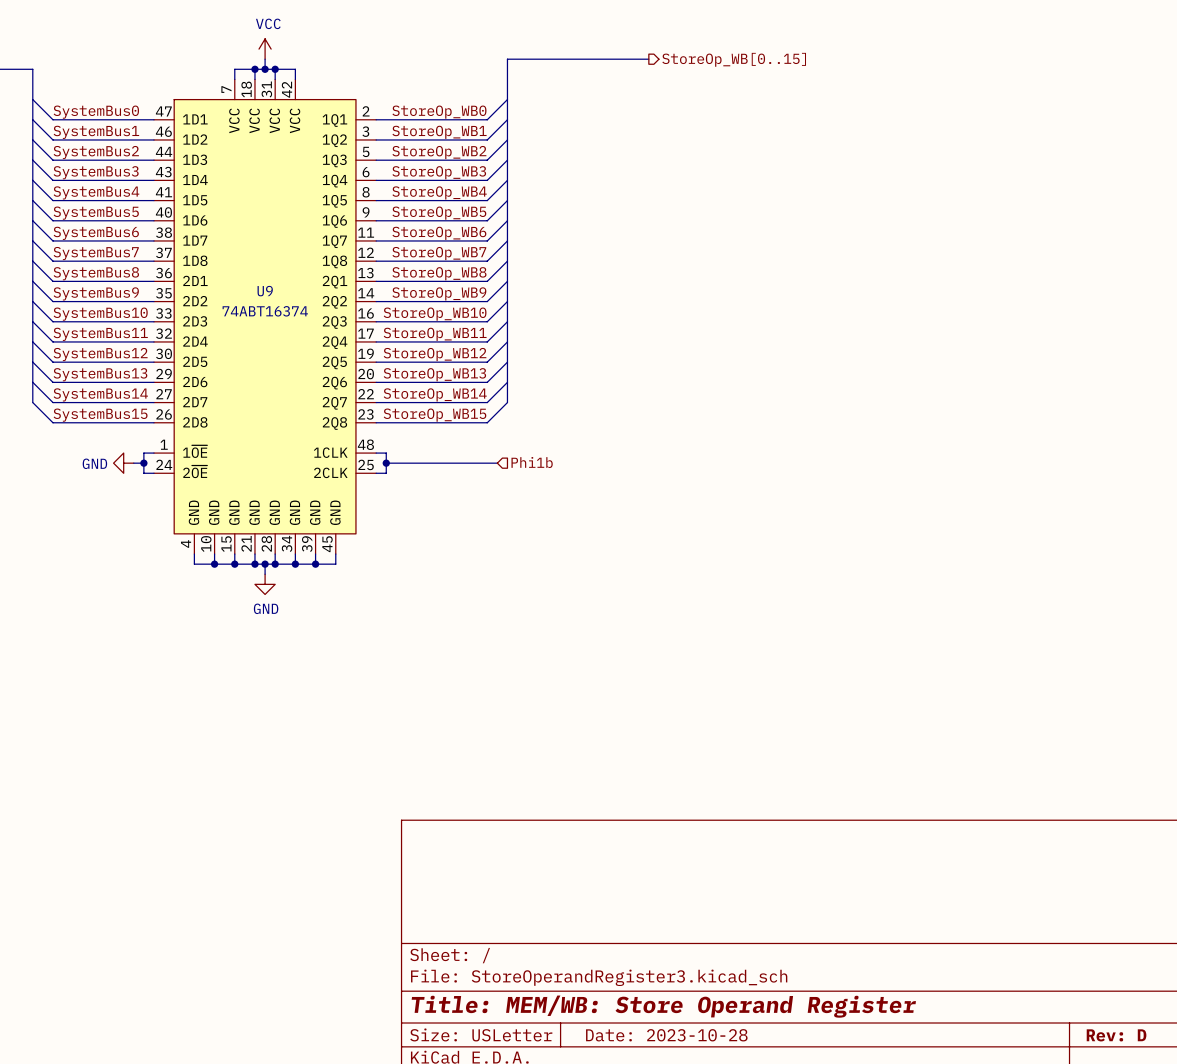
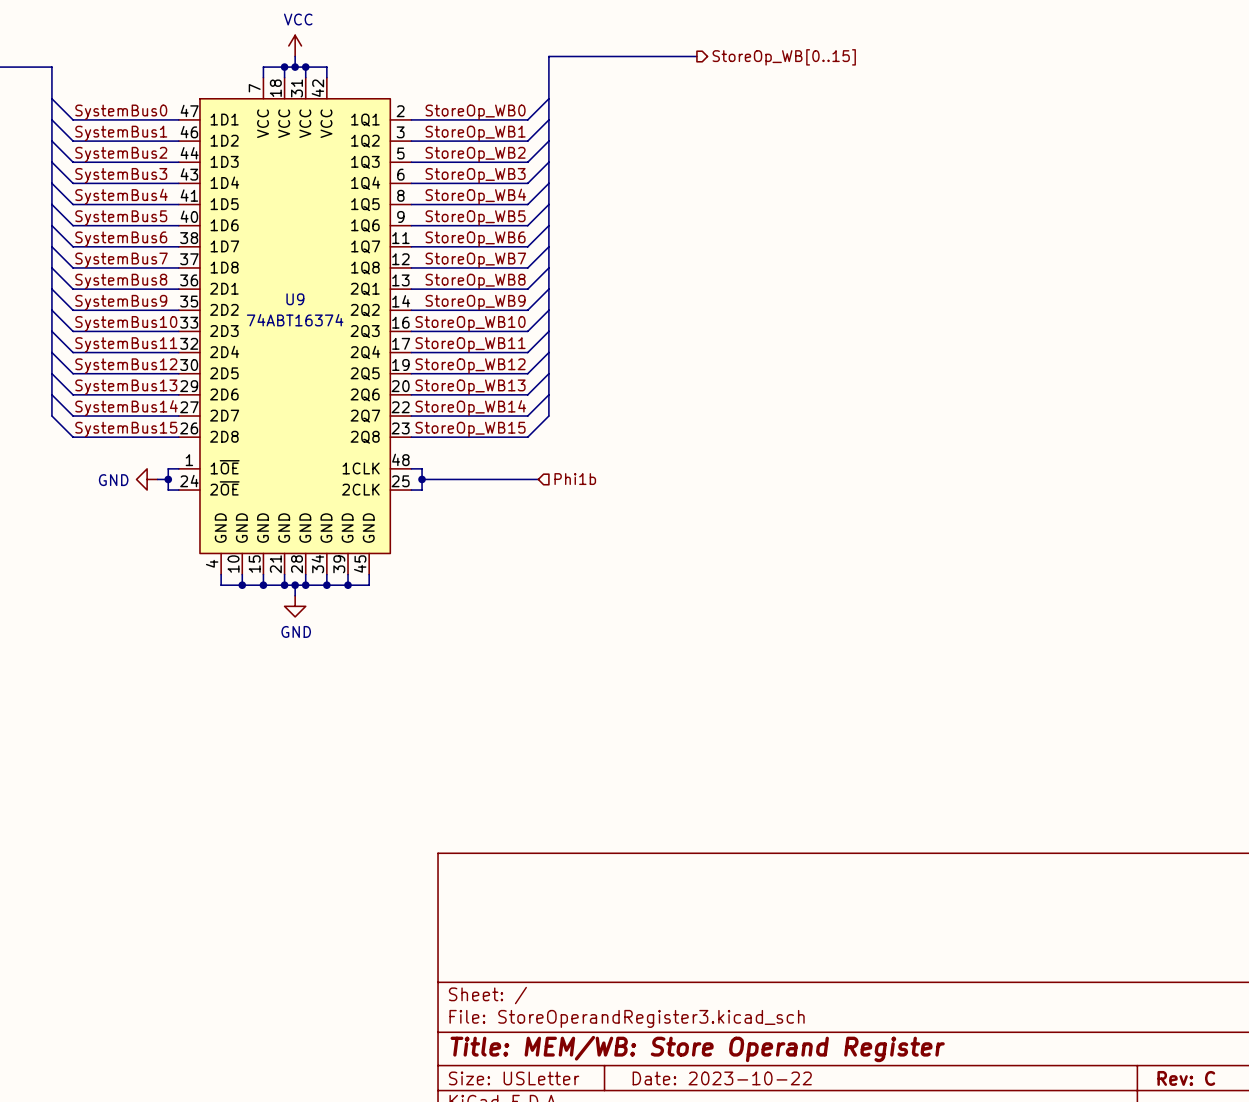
title block: Date: 2023-10-28 (666, 1035) -> Date: 2023-10-22 (722, 1078)
title block: Rev: D (1116, 1035) -> Rev: C (1186, 1078)

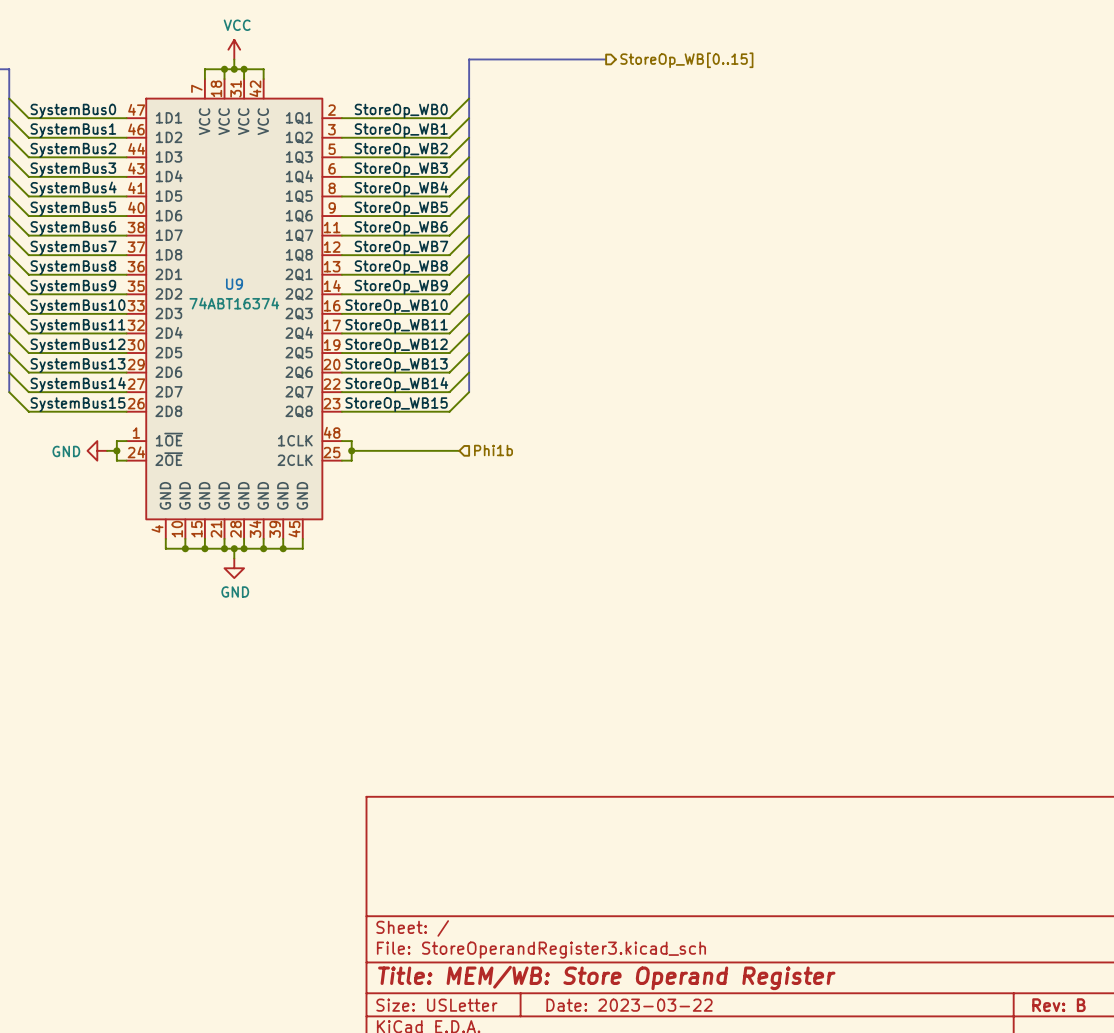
title block: Date: 2023-10-22 (722, 1078) -> Date: 2023-03-22 (629, 1005)
title block: Rev: C (1186, 1078) -> Rev: B (1058, 1005)

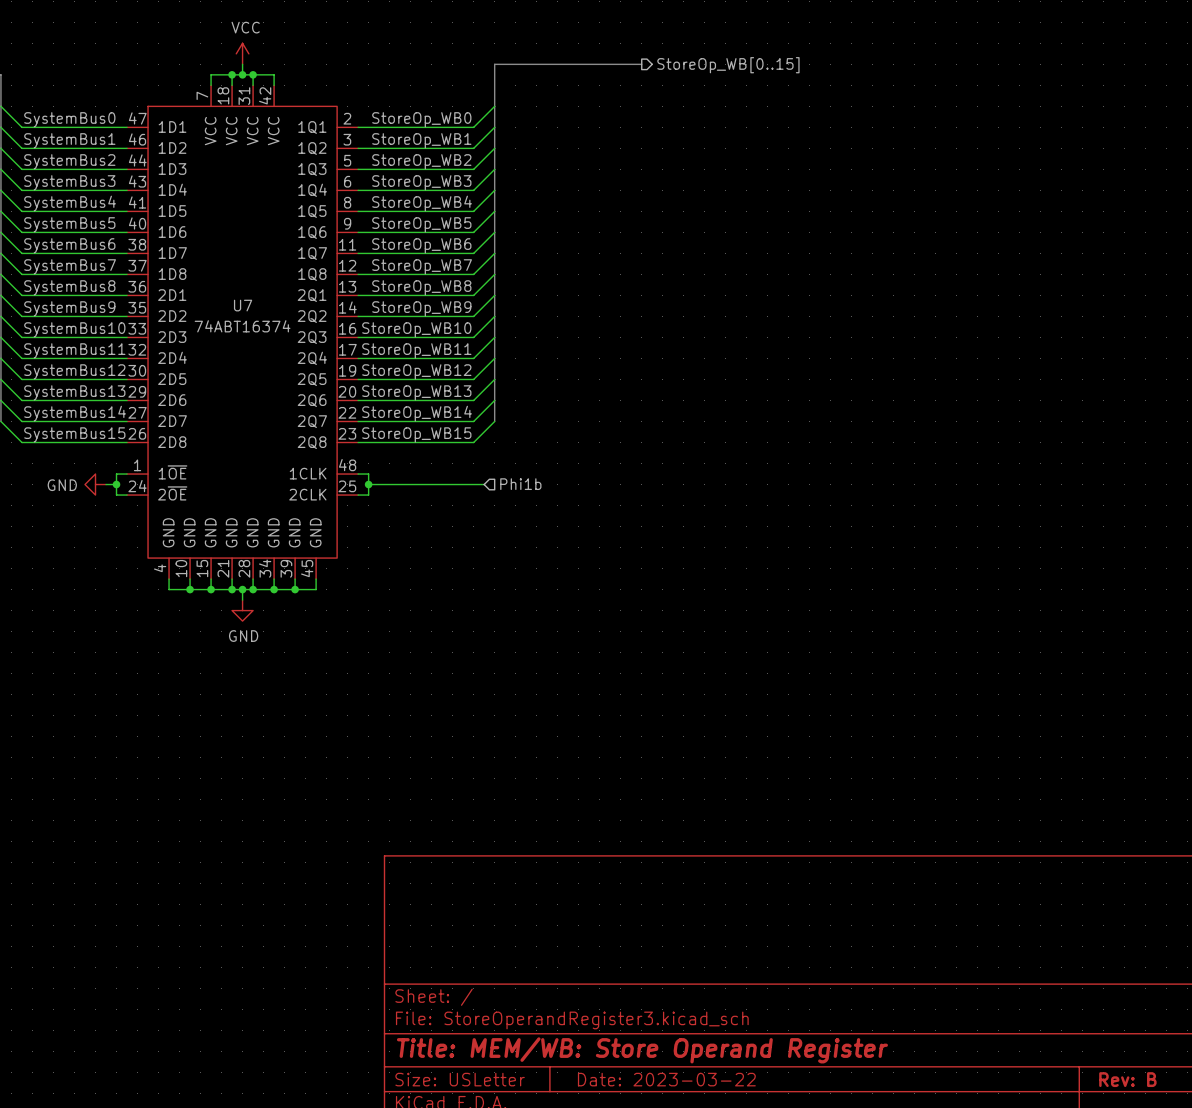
U9 name: U9 (234, 284) -> U7 (243, 305)

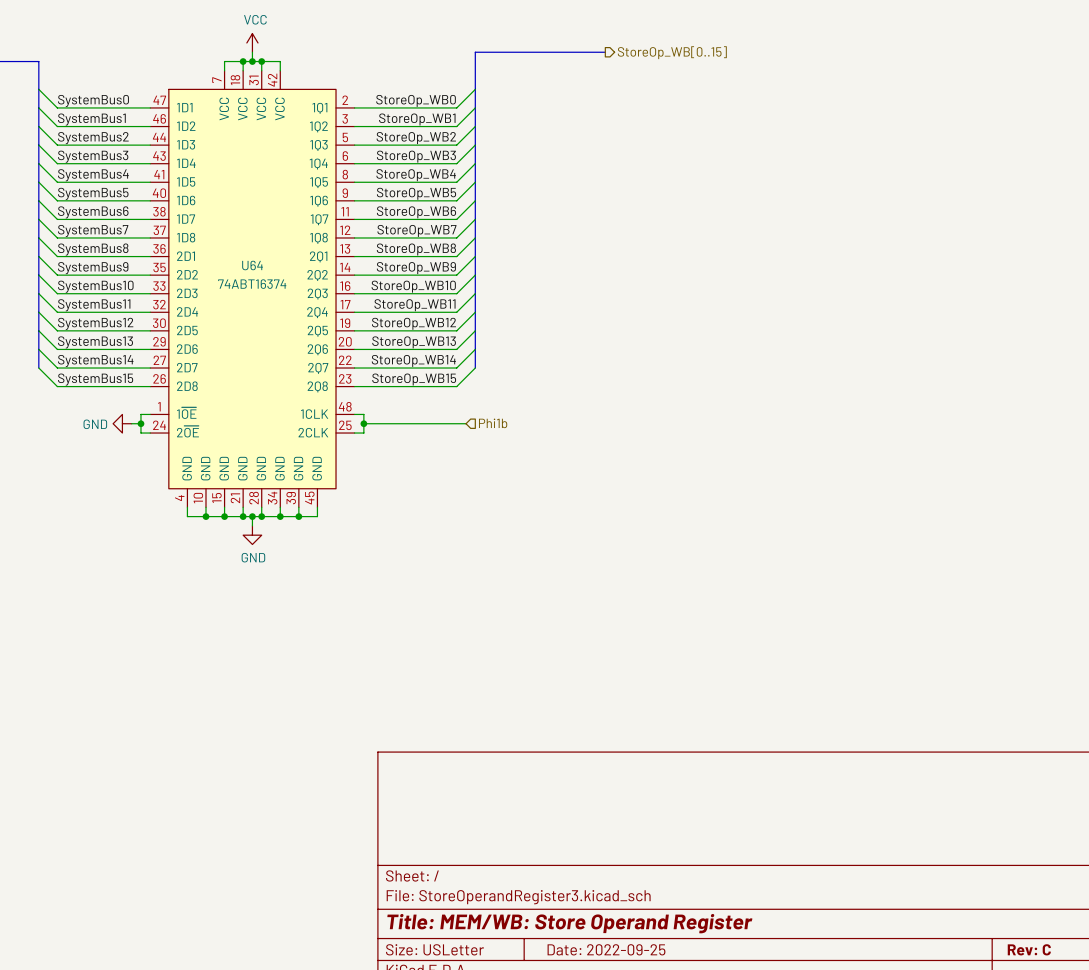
U7 name: U7 (243, 305) -> U64 (252, 265)
title block: Date: 2023-03-22 (666, 1079) -> Date: 2022-09-25 (606, 949)
title block: Rev: B (1127, 1079) -> Rev: C (1029, 949)

